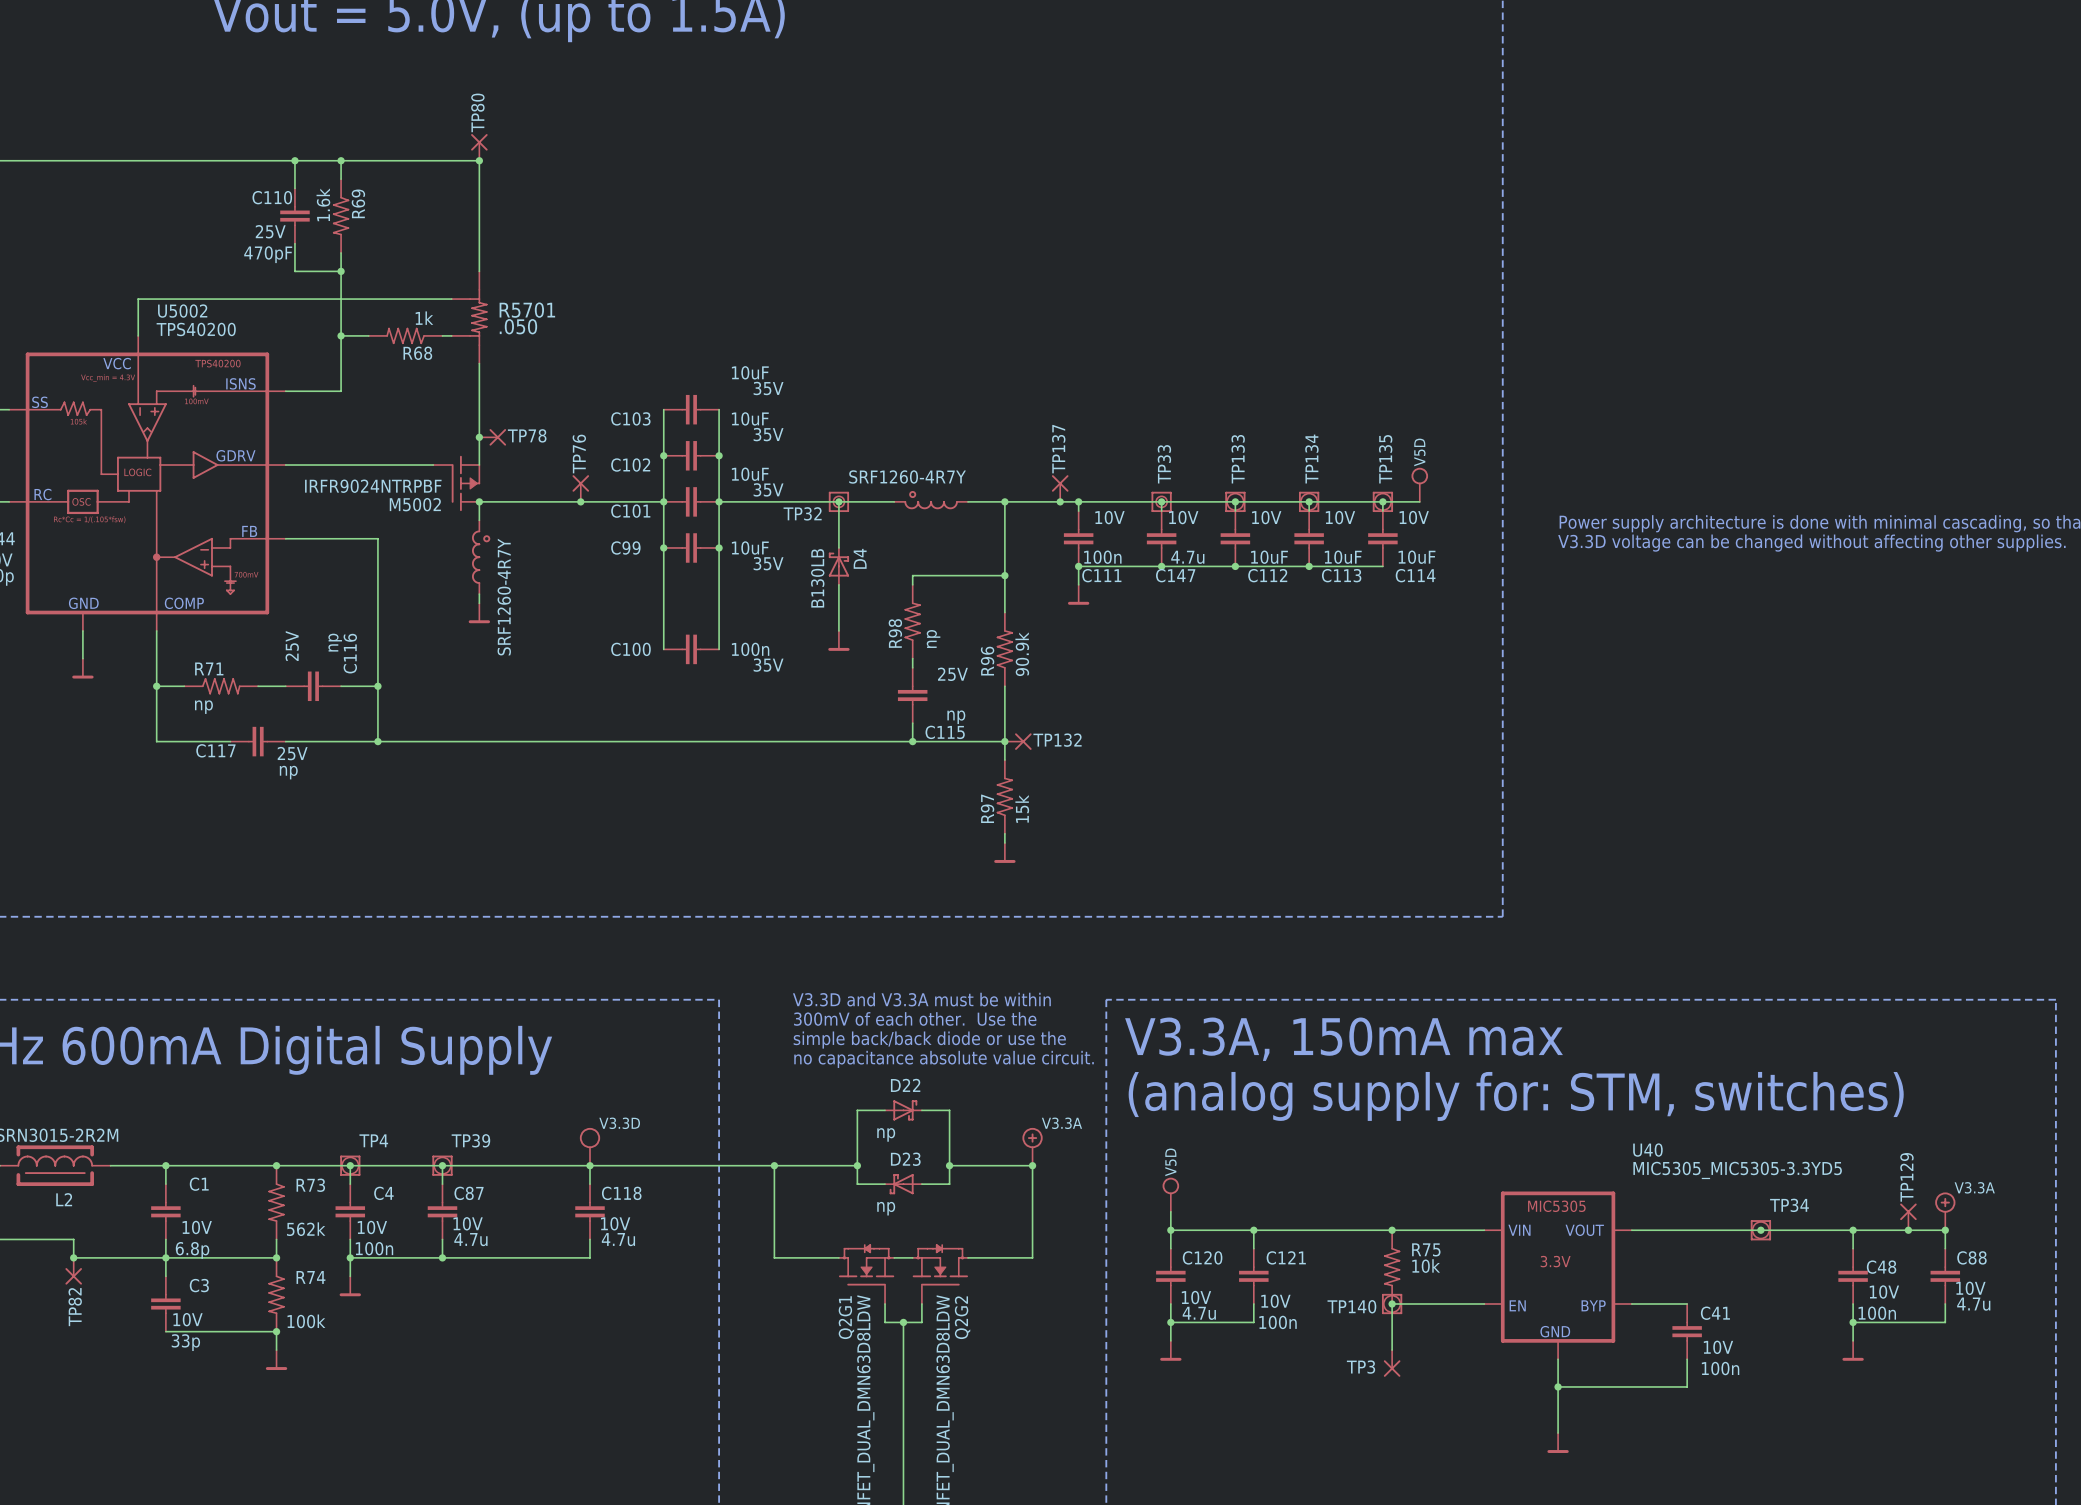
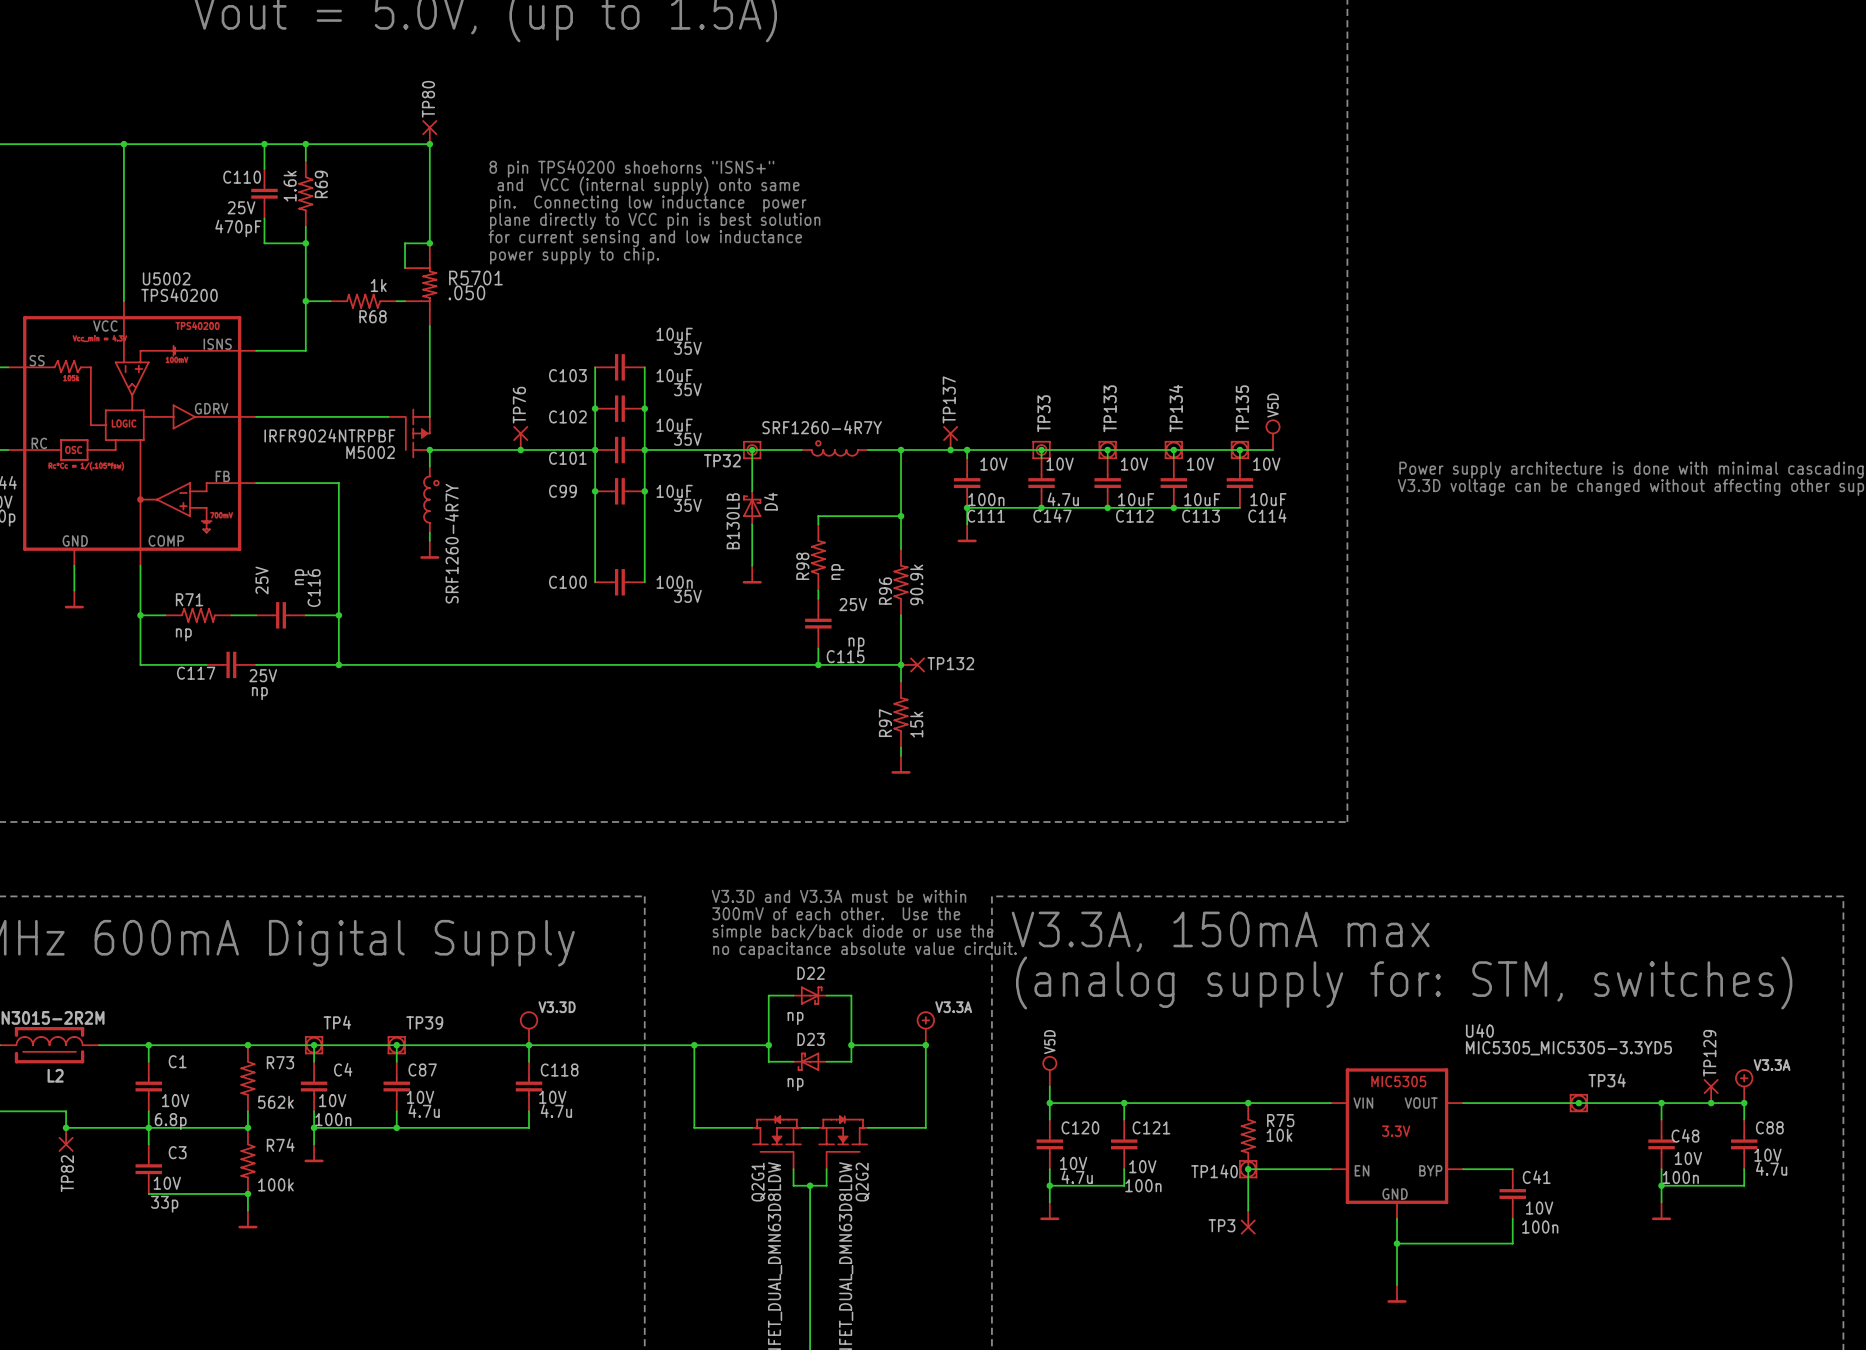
wire: none -> (123, 144) (123, 268)
junction: none -> (123, 144)
text: none -> 8 pin TPS40200 shoehorns "ISNS+" (631, 168)
text: none -> and VCC (internal supply) onto same (648, 186)
text: none -> pin. Connecting low inductance power (648, 203)
text: none -> plane directly to VCC pin is best solution (655, 221)
text: none -> for current sensing and low inductance (645, 238)
junction: none -> (429, 243)
text: none -> power supply to chip. (574, 256)
wire: (138, 299) (451, 299) -> (429, 243) (405, 243) (405, 268)
junction: (479, 437) -> none
TP78: (492, 437) -> none

